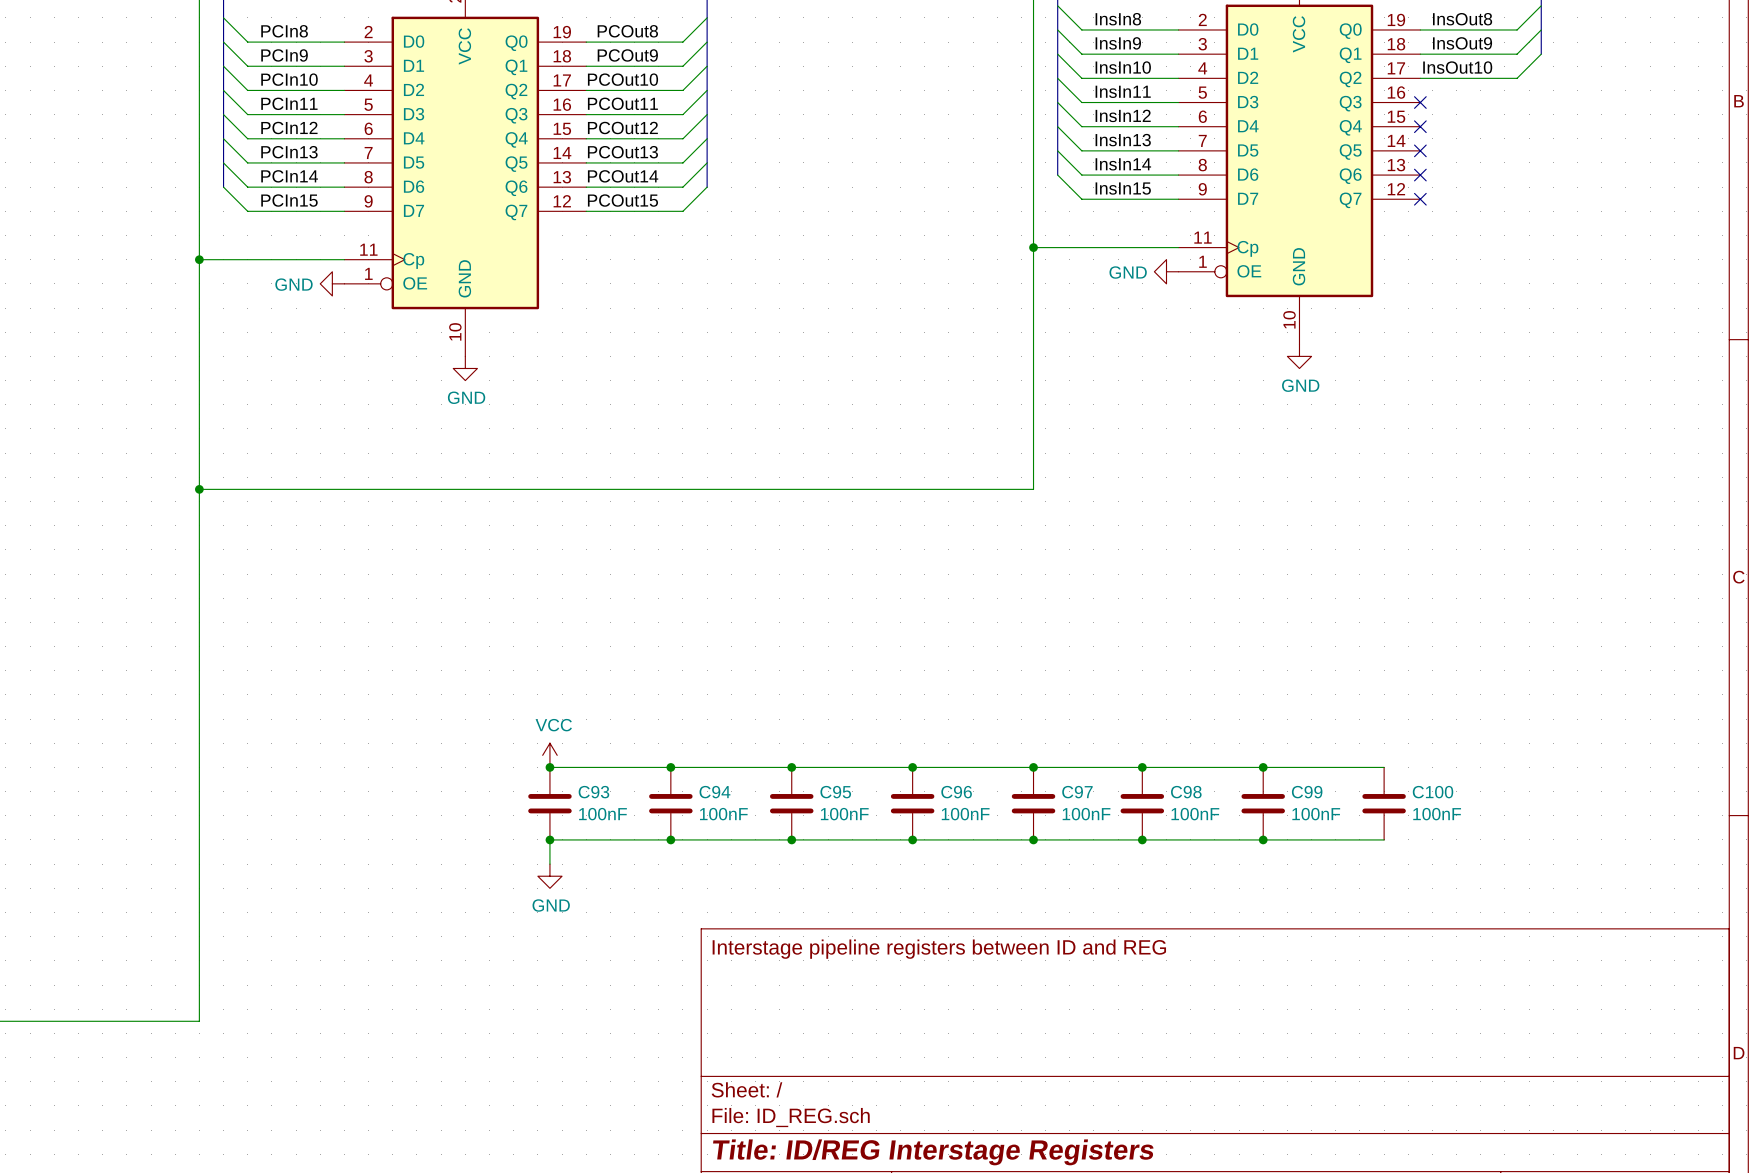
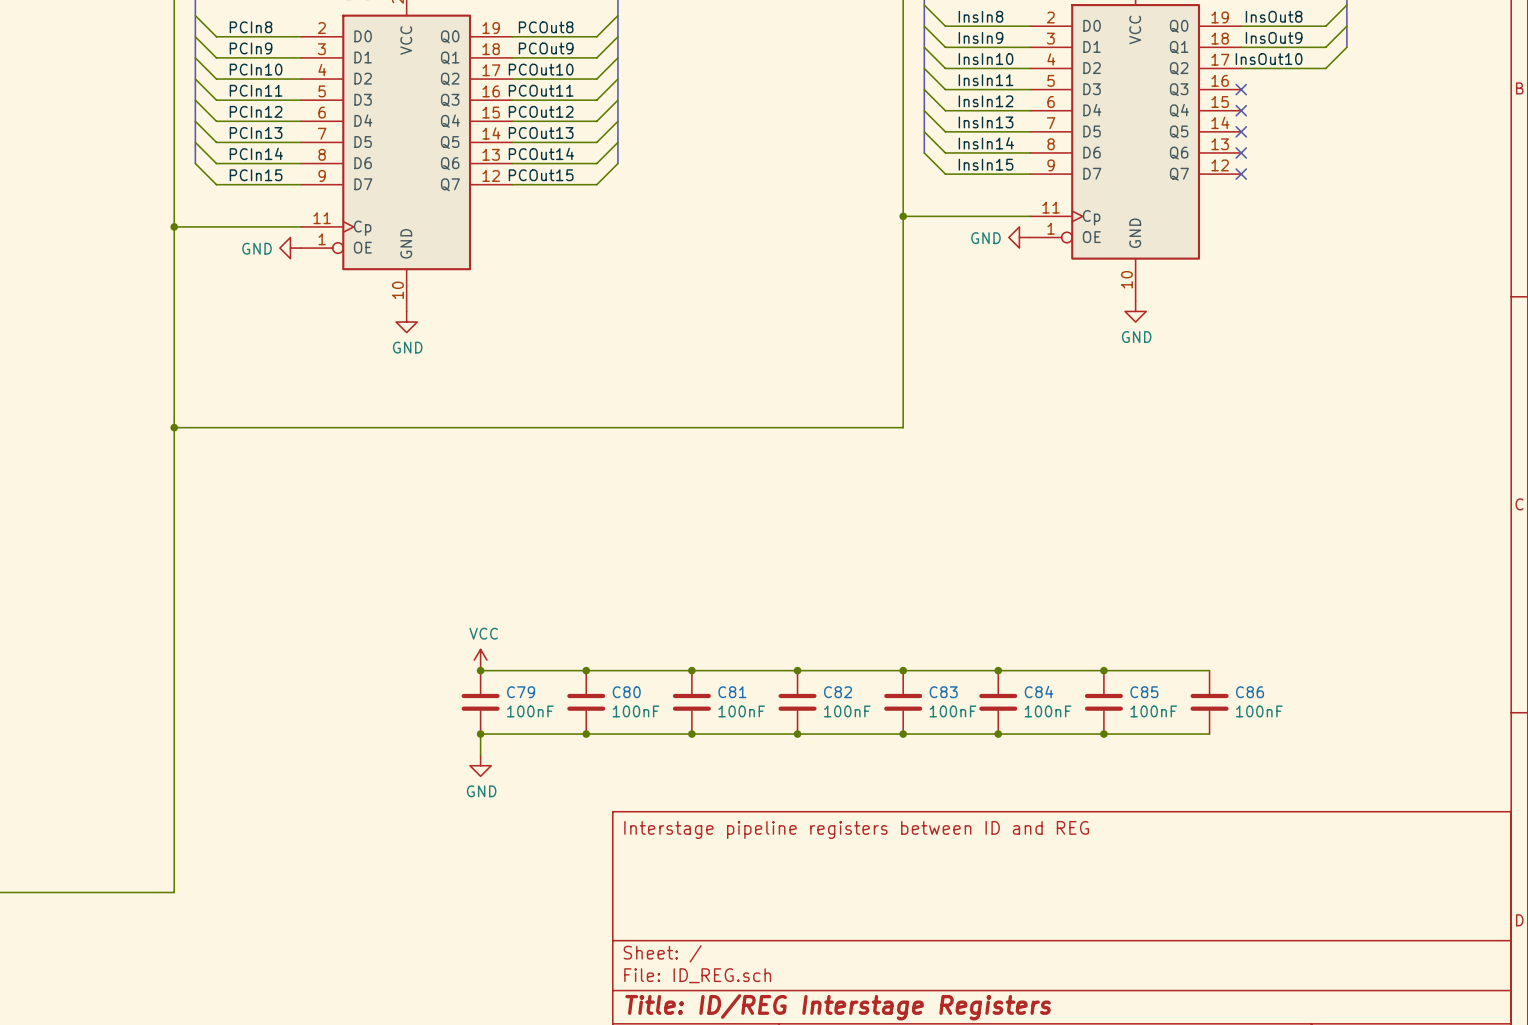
C93 name: C93 (593, 792) -> C79 (521, 692)
C94 name: C94 (714, 792) -> C80 (626, 692)
C95 name: C95 (835, 792) -> C81 (732, 692)
C96 name: C96 (956, 792) -> C82 (838, 692)
C97 name: C97 (1077, 792) -> C83 (943, 692)
C98 name: C98 (1186, 792) -> C84 (1038, 691)
C99 name: C99 (1307, 792) -> C85 (1144, 692)
C100 name: C100 (1433, 792) -> C86 (1250, 692)

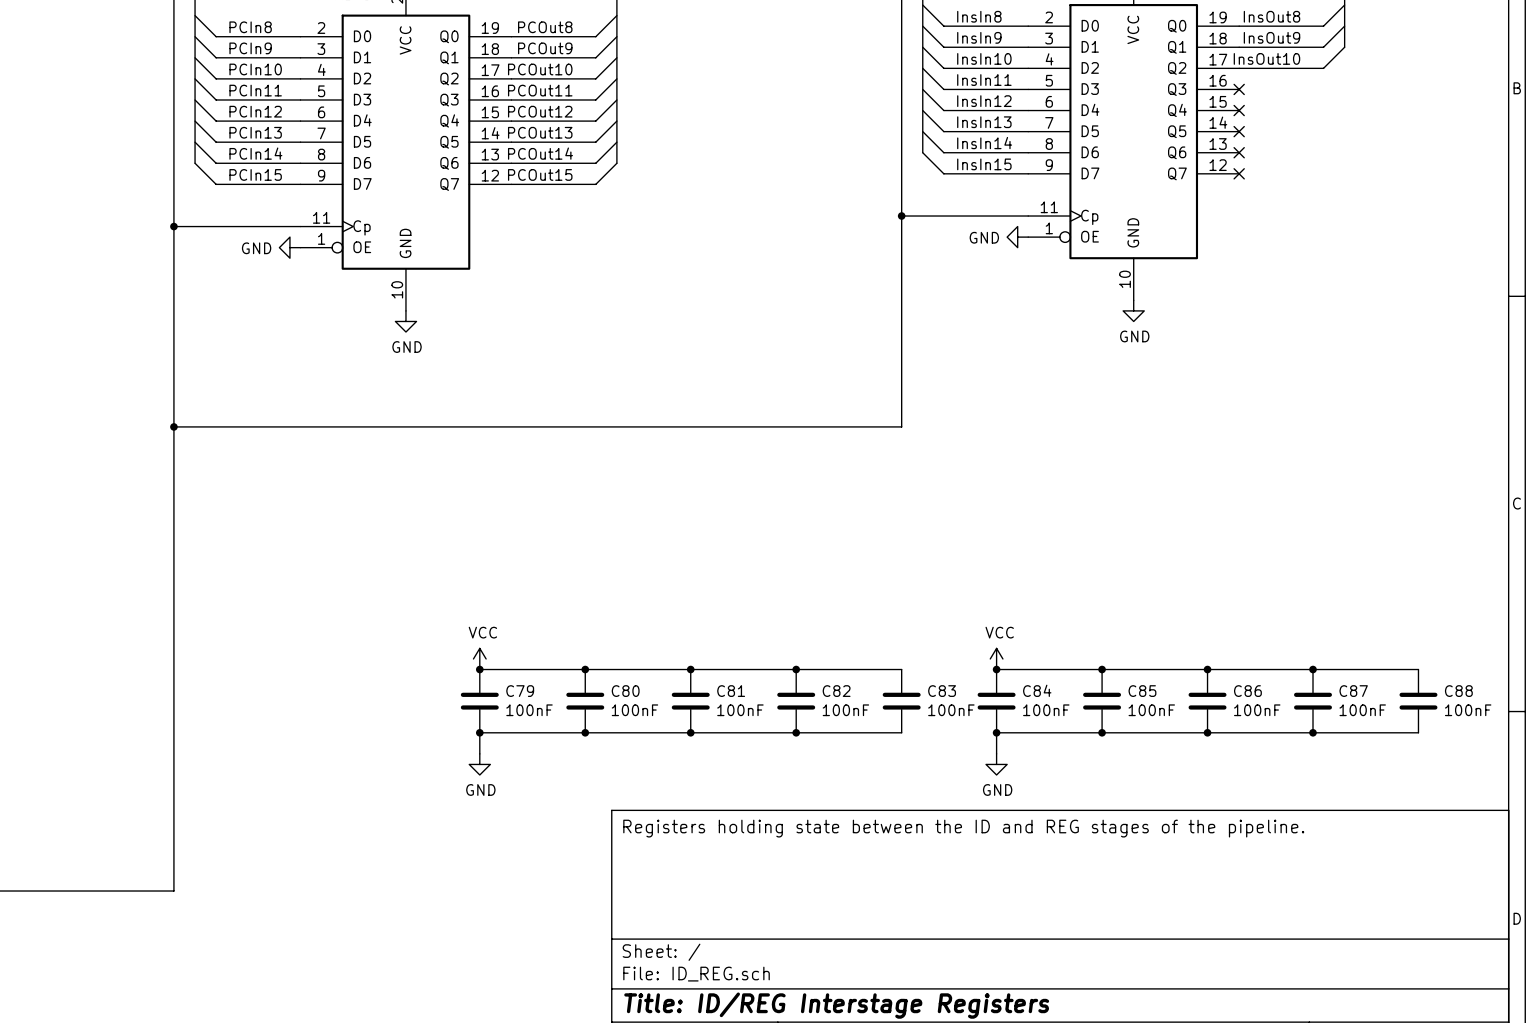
power symbol: none -> VCC (996, 658)
wire: (903, 670) (998, 670) -> none
junction: (903, 670) -> none
wire: none -> (1207, 669) (1418, 669)
junction: none -> (1207, 669)
junction: none -> (1313, 669)
C87: none -> 100nF (1313, 701)
C88: none -> 100nF (1418, 701)
wire: (903, 734) (998, 734) -> (996, 753) (996, 732)
junction: (903, 734) -> none
wire: none -> (1207, 732) (1418, 732)
junction: none -> (1207, 732)
junction: none -> (1313, 732)
power symbol: none -> GND (996, 764)
title block: Interstage pipeline registers between ID and REG (856, 829) -> Registers holding state between the ID and REG stages of the pipeline. (963, 828)

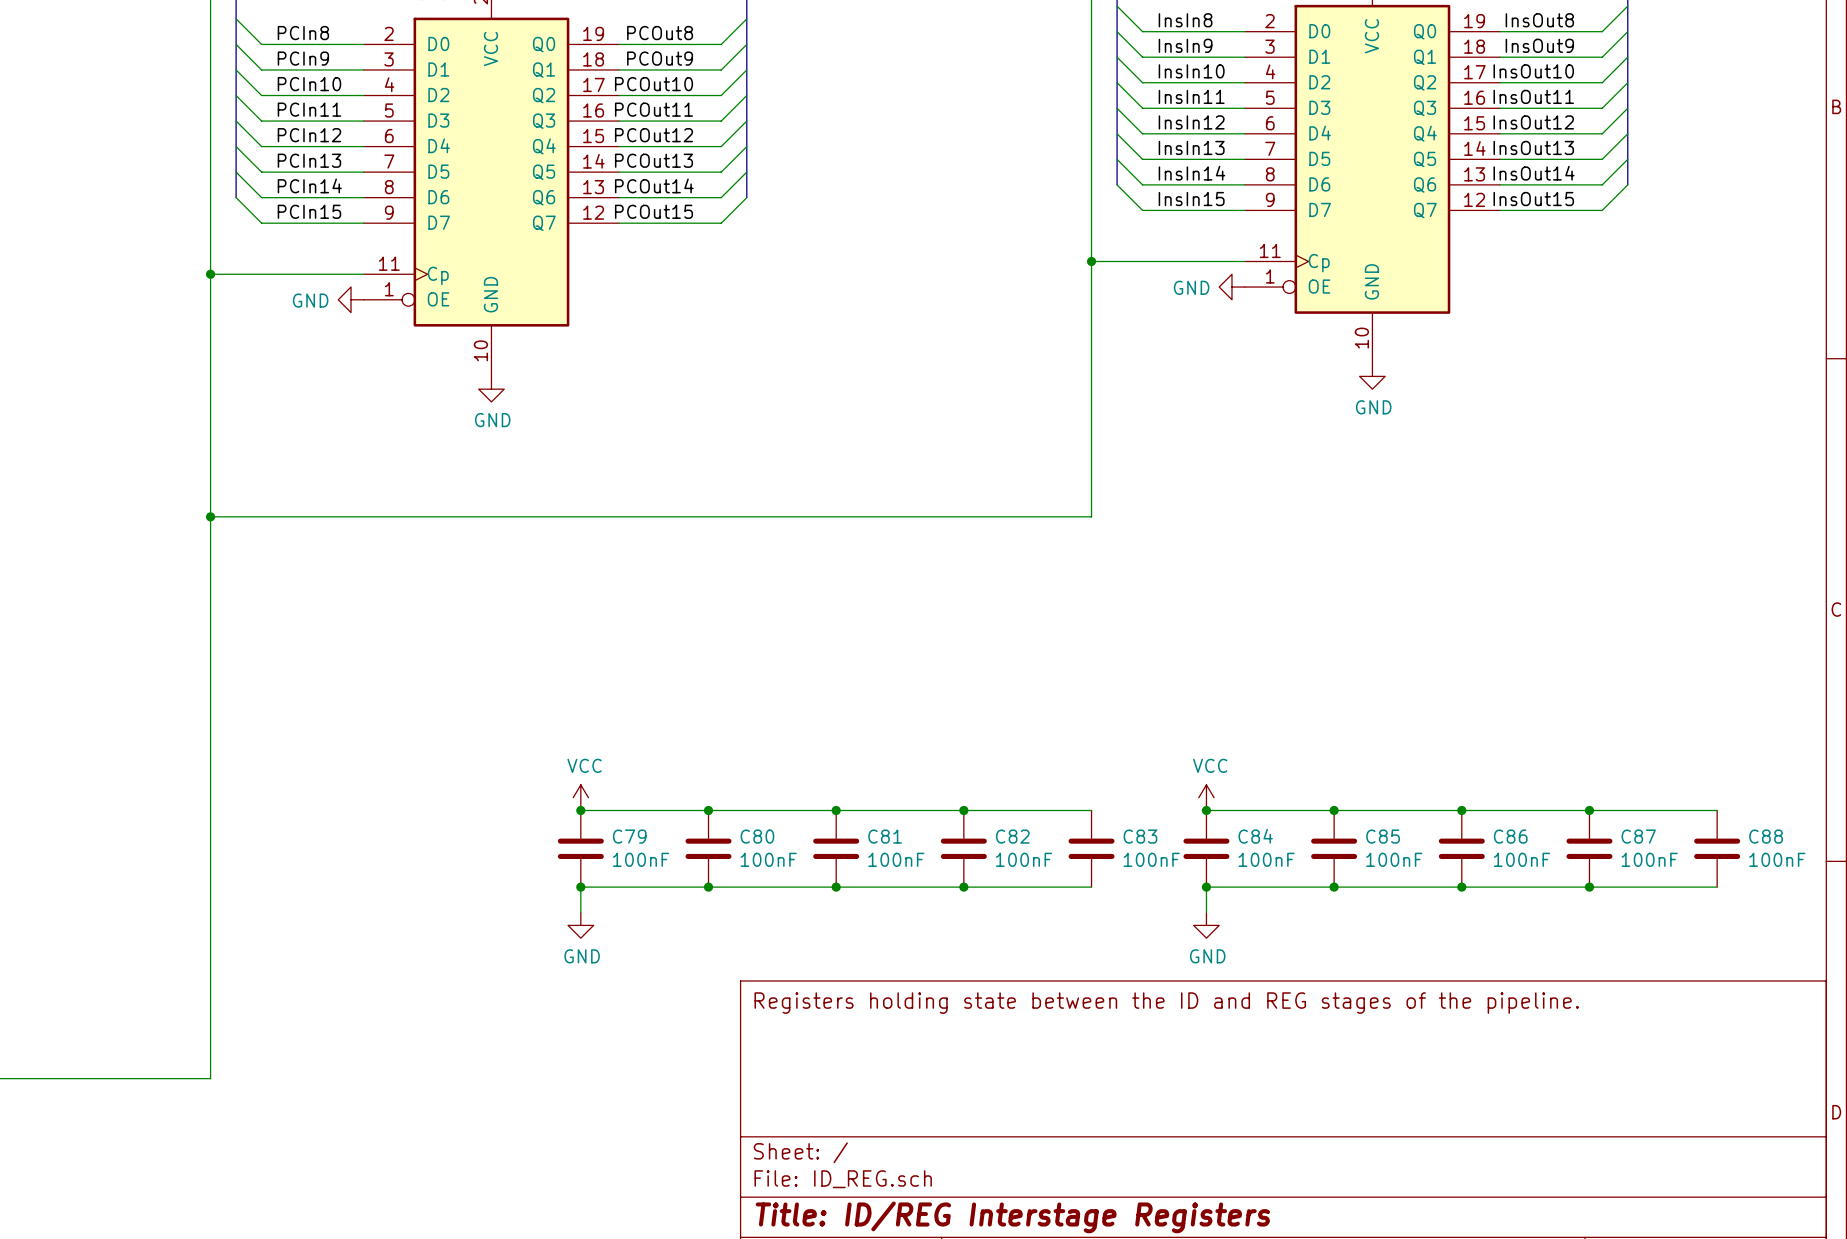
bus: none -> (1627, 57) (1627, 184)
wire: none -> (1627, 82) (1602, 108) (1500, 108)
label: none -> InsOut11 (1533, 96)
no-connect mark: (1239, 89) -> none
wire: none -> (1627, 108) (1602, 133) (1500, 133)
label: none -> InsOut12 (1533, 122)
no-connect mark: (1239, 110) -> none
wire: none -> (1627, 133) (1602, 159) (1500, 159)
label: none -> InsOut13 (1533, 147)
no-connect mark: (1239, 131) -> none
wire: none -> (1627, 159) (1602, 184) (1500, 184)
label: none -> InsOut14 (1534, 173)
no-connect mark: (1239, 152) -> none
wire: none -> (1627, 184) (1602, 210) (1500, 210)
label: none -> InsOut15 (1533, 199)
no-connect mark: (1239, 173) -> none

